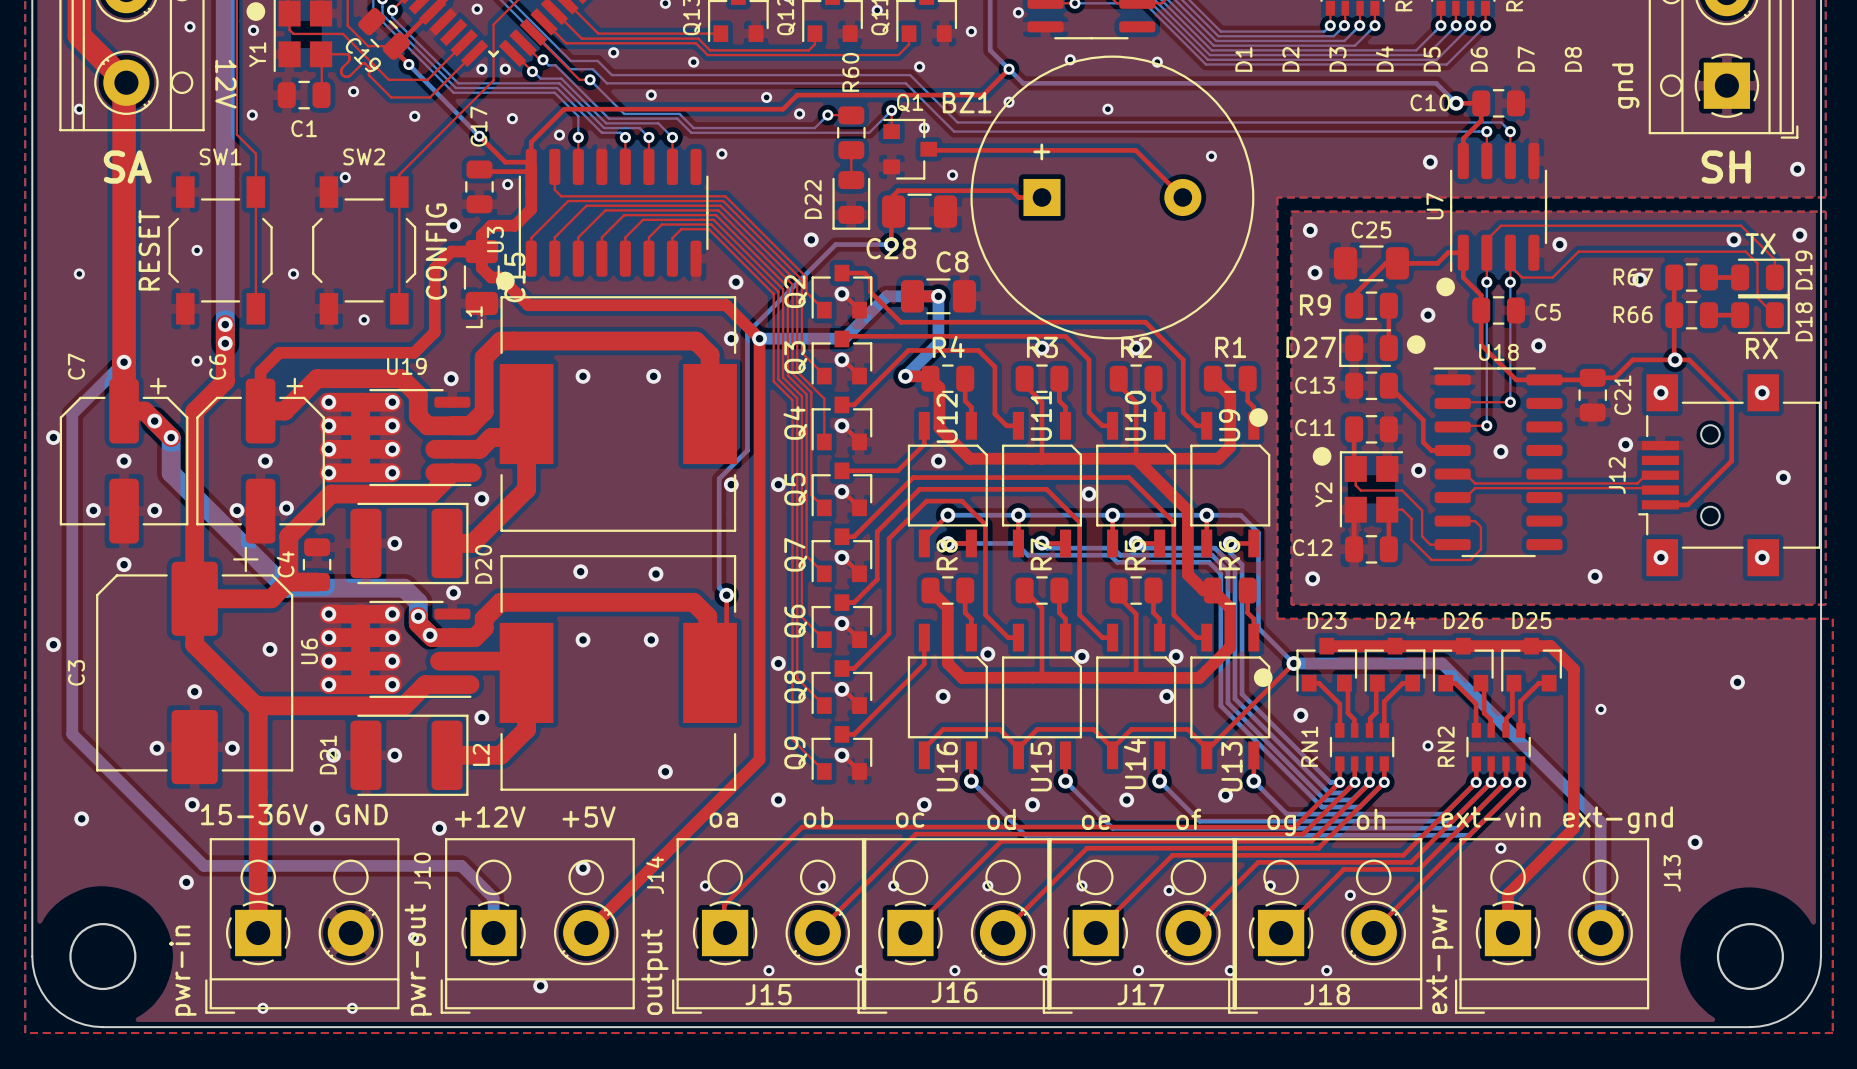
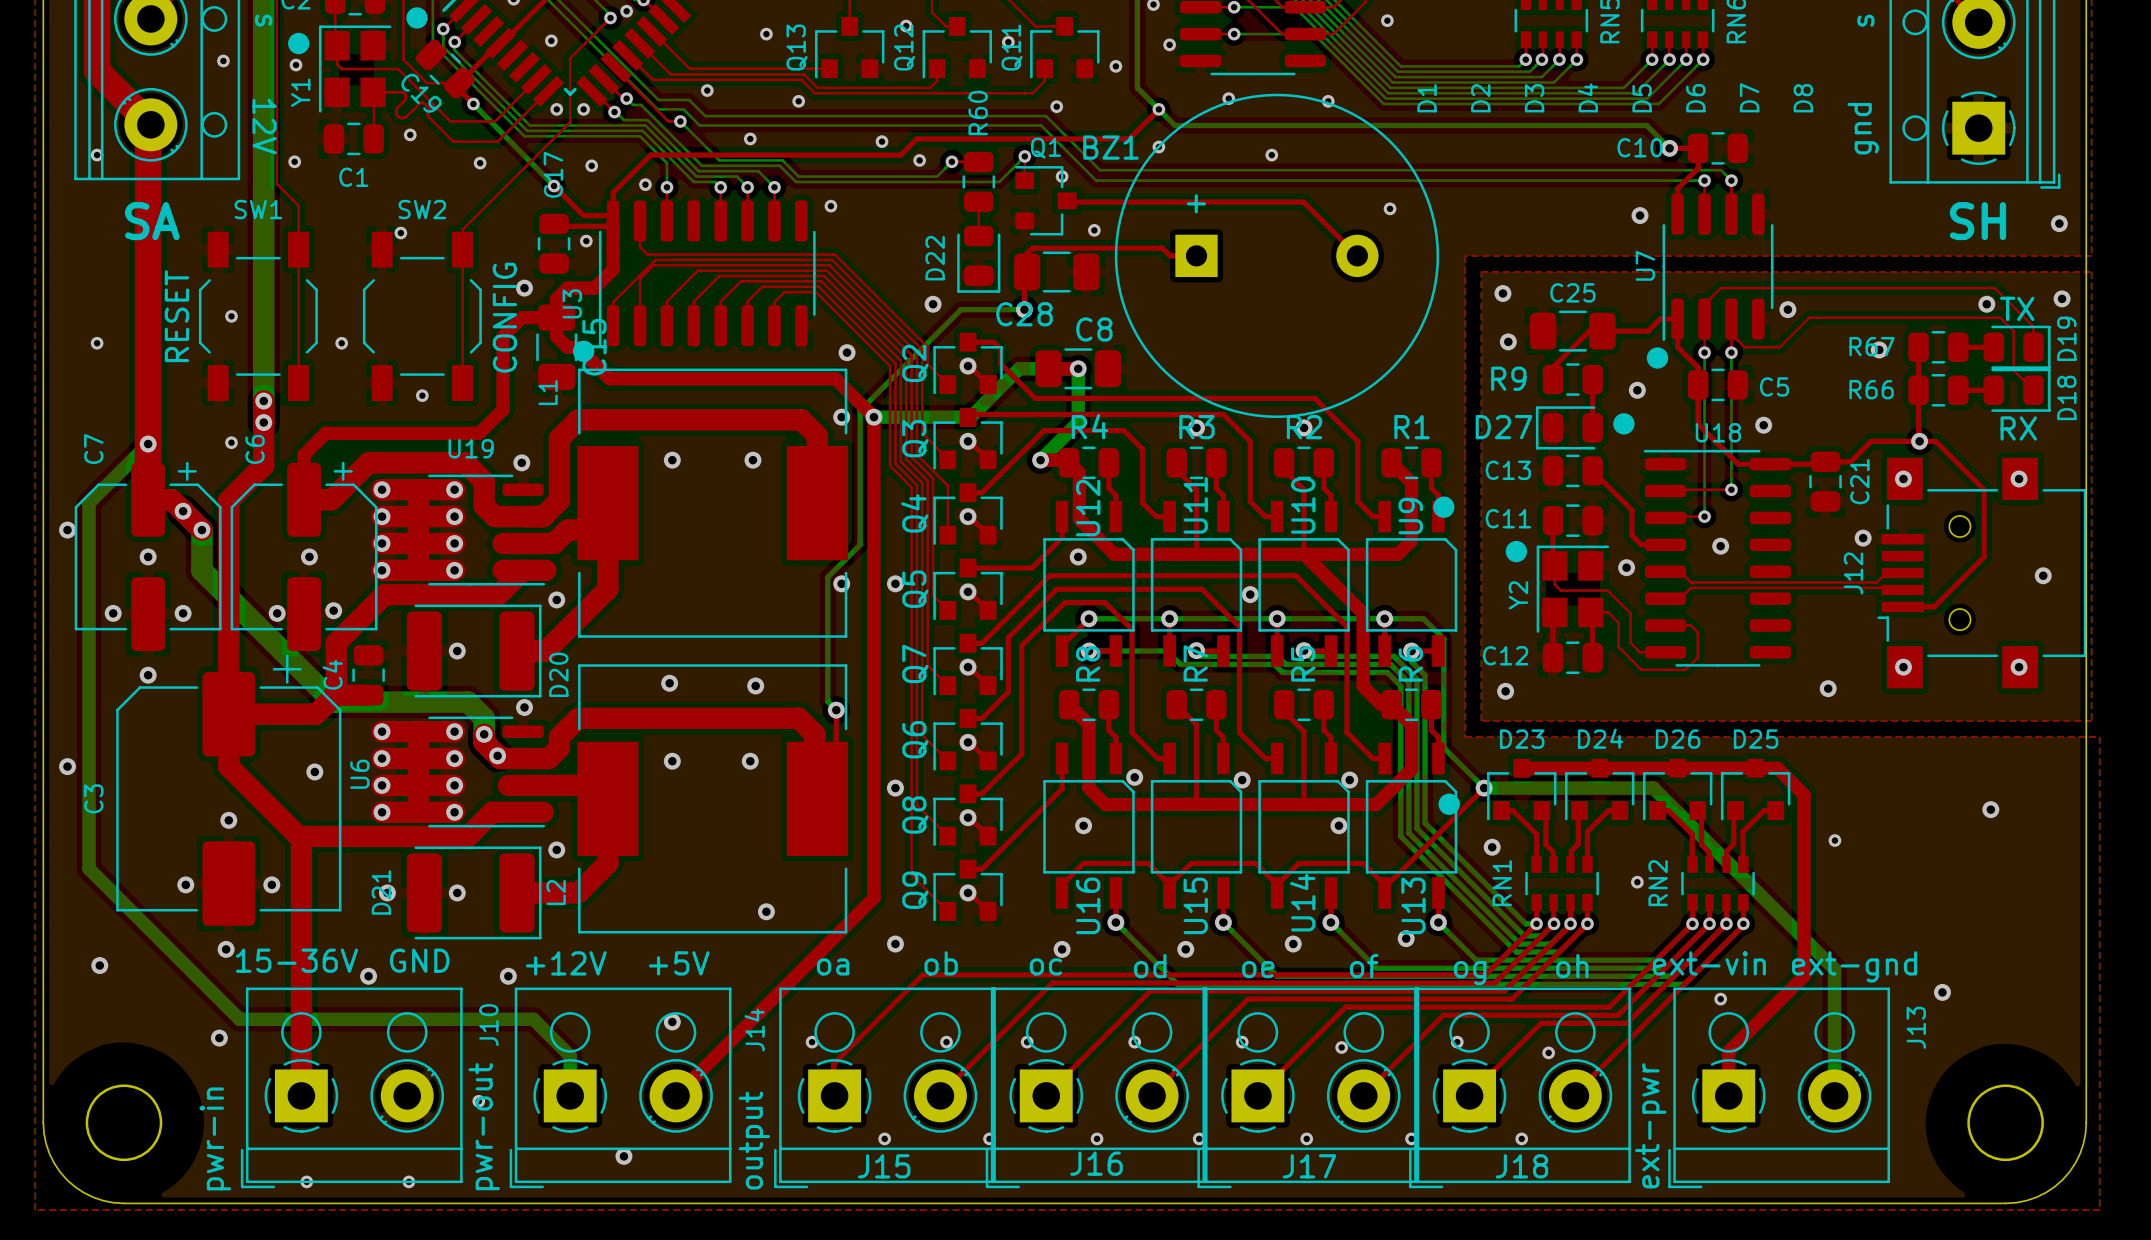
top track: (586, 205) (554, 237) -> (676, 265) (653, 265) (640, 278) (640, 301)

